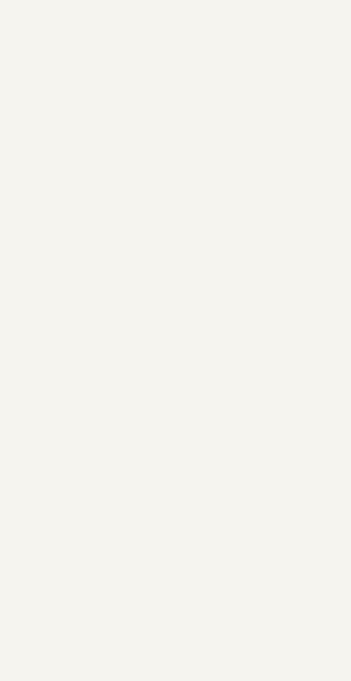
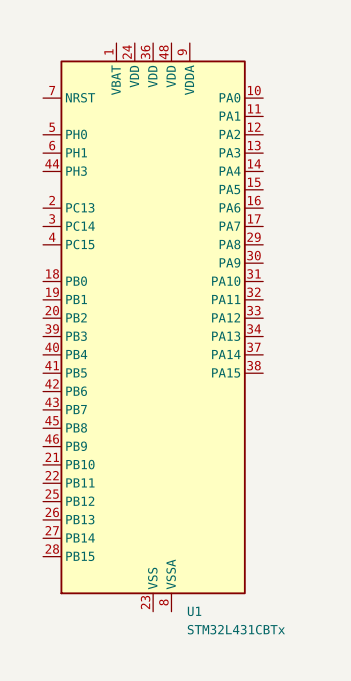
U1: none -> STM32L431CBTx (153, 327)

